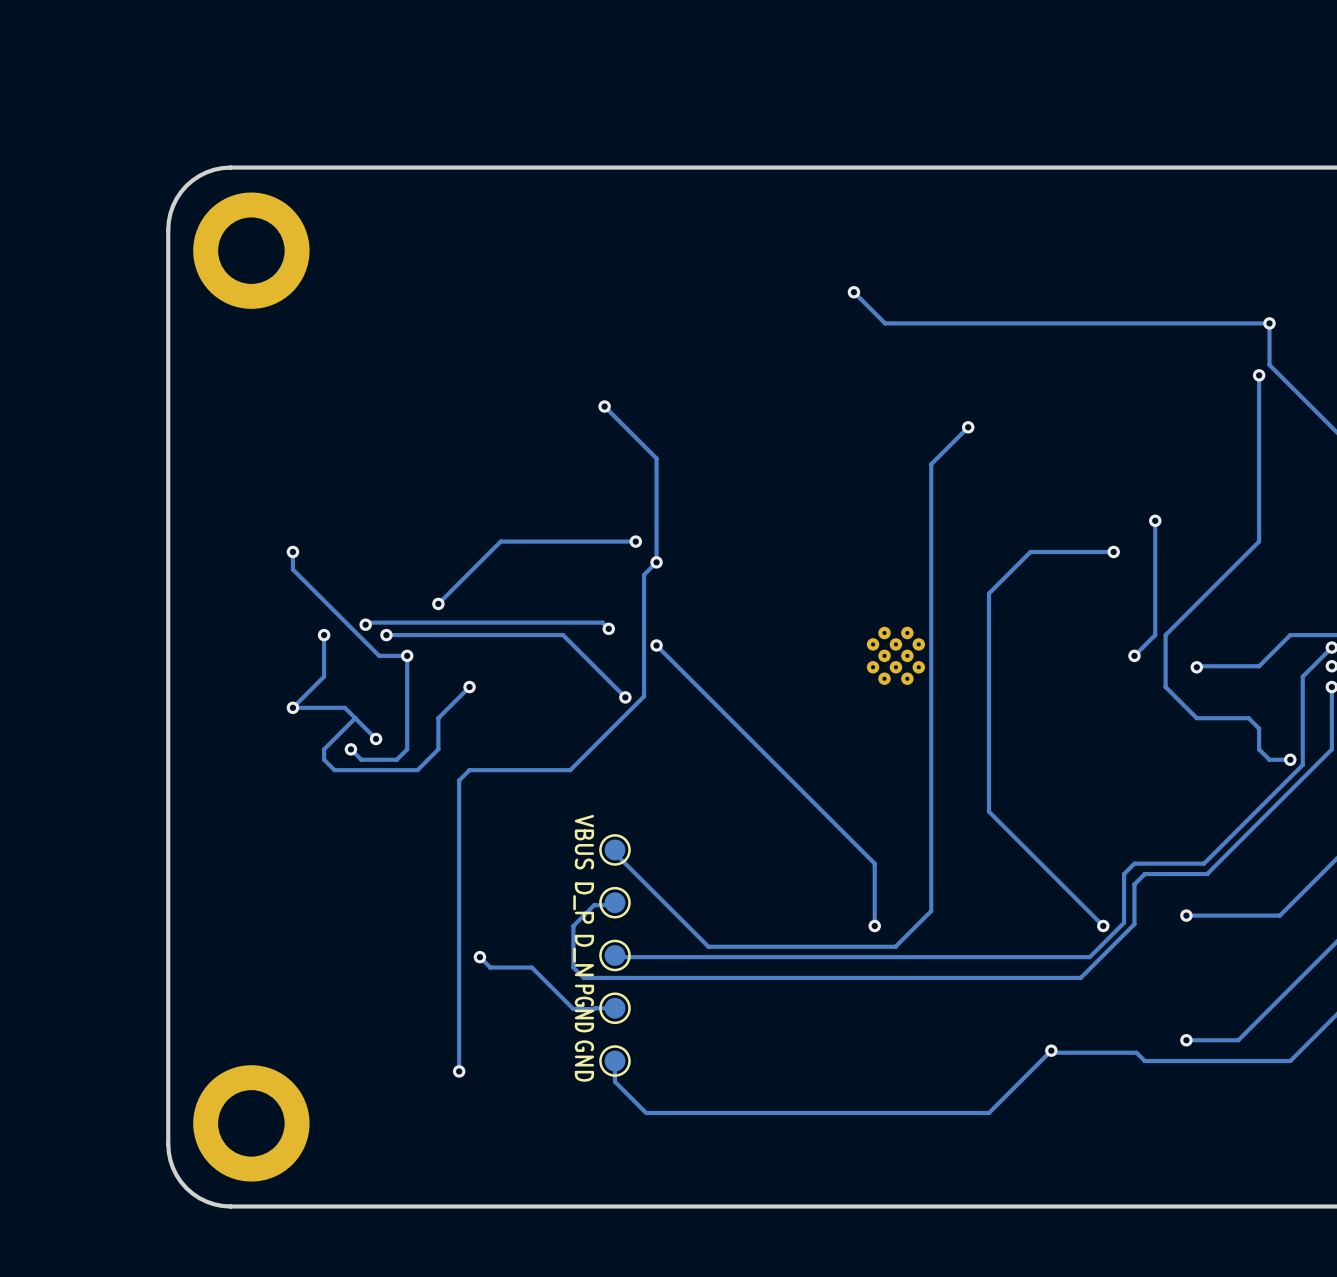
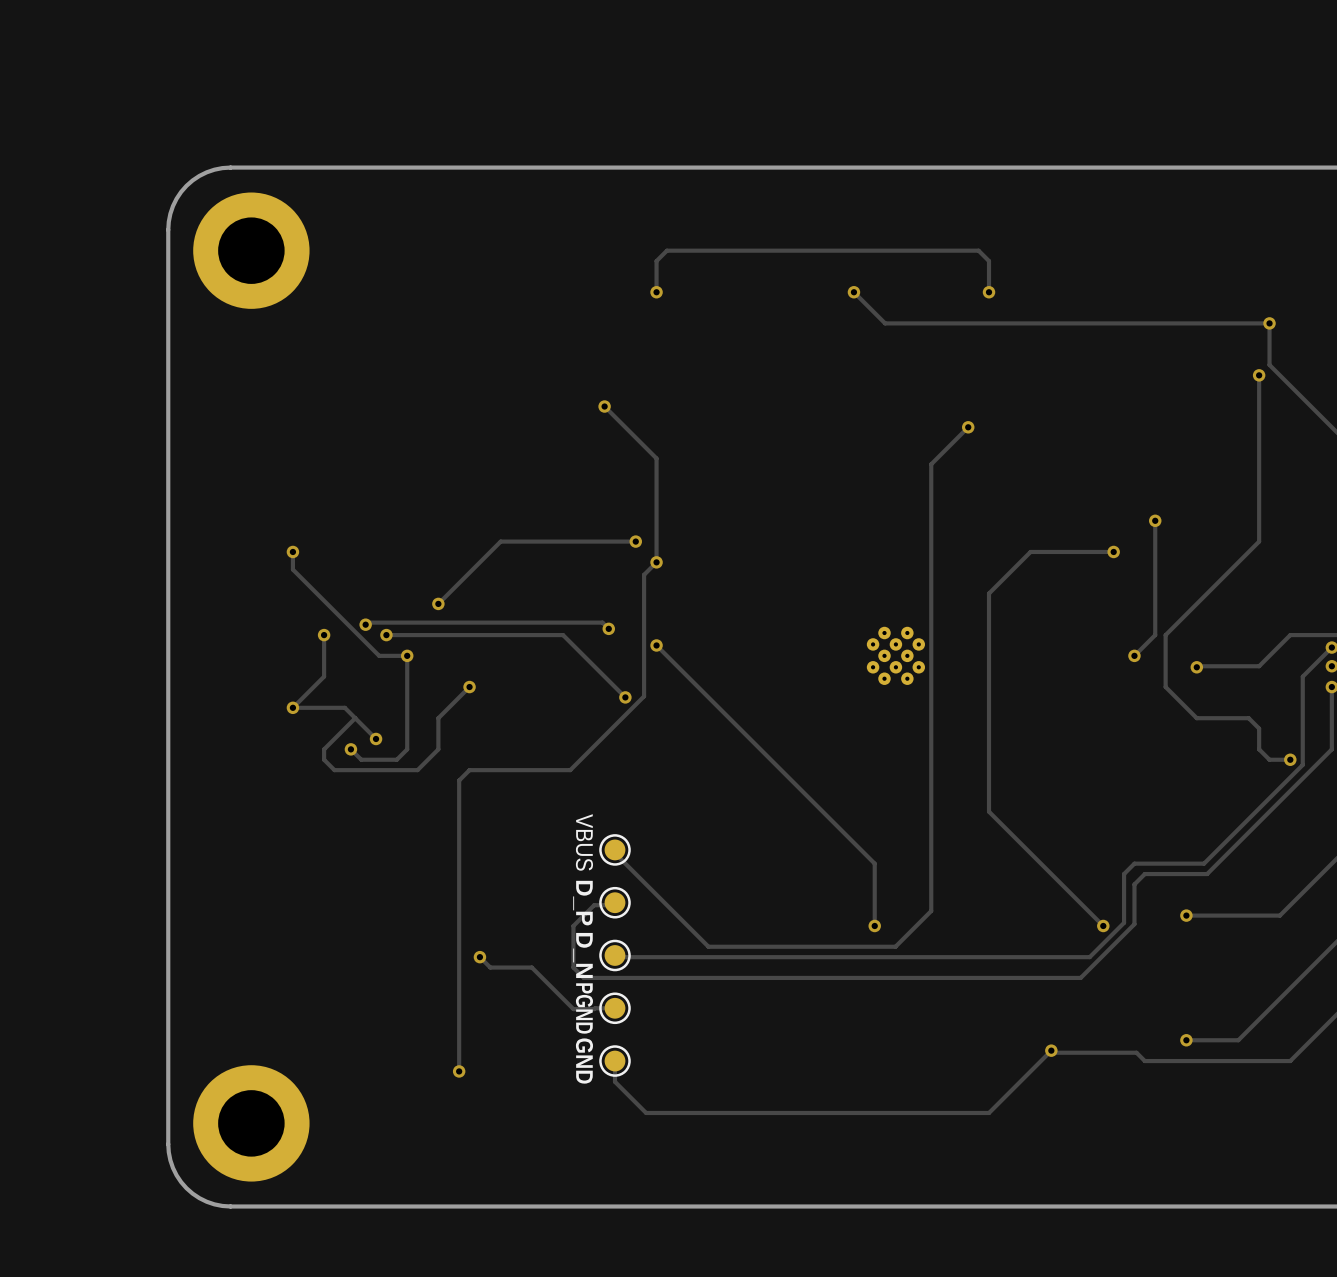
via: none -> (656, 292)
track: none -> (989, 292) (989, 261) (978, 250) (666, 250) (656, 261) (656, 292)
via: none -> (989, 292)

